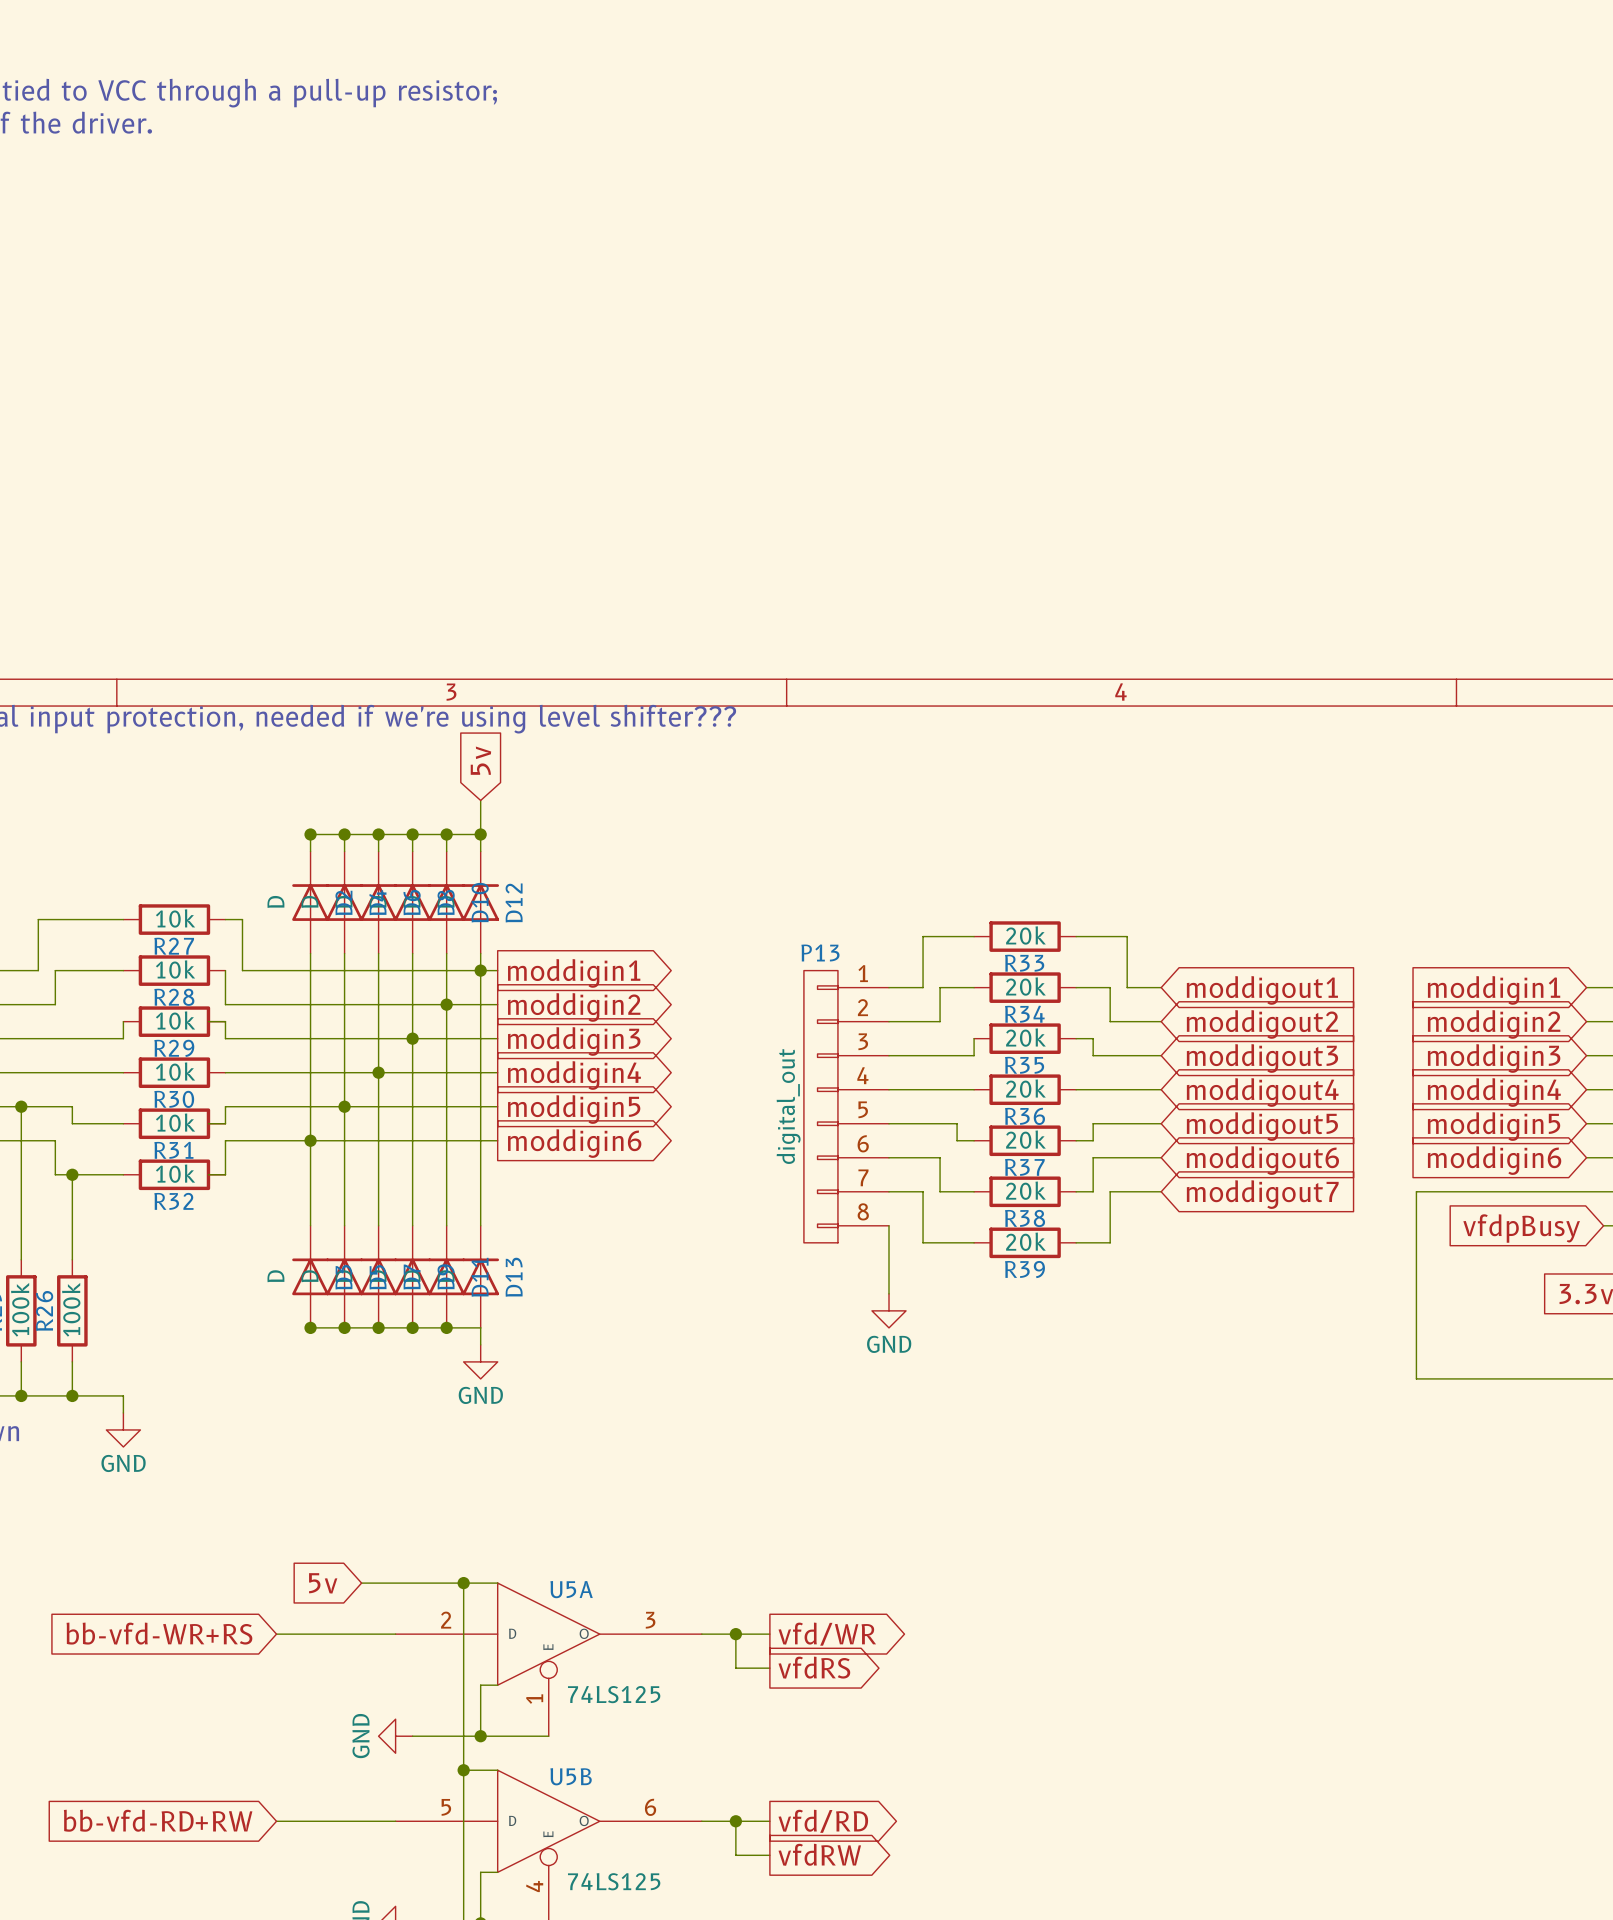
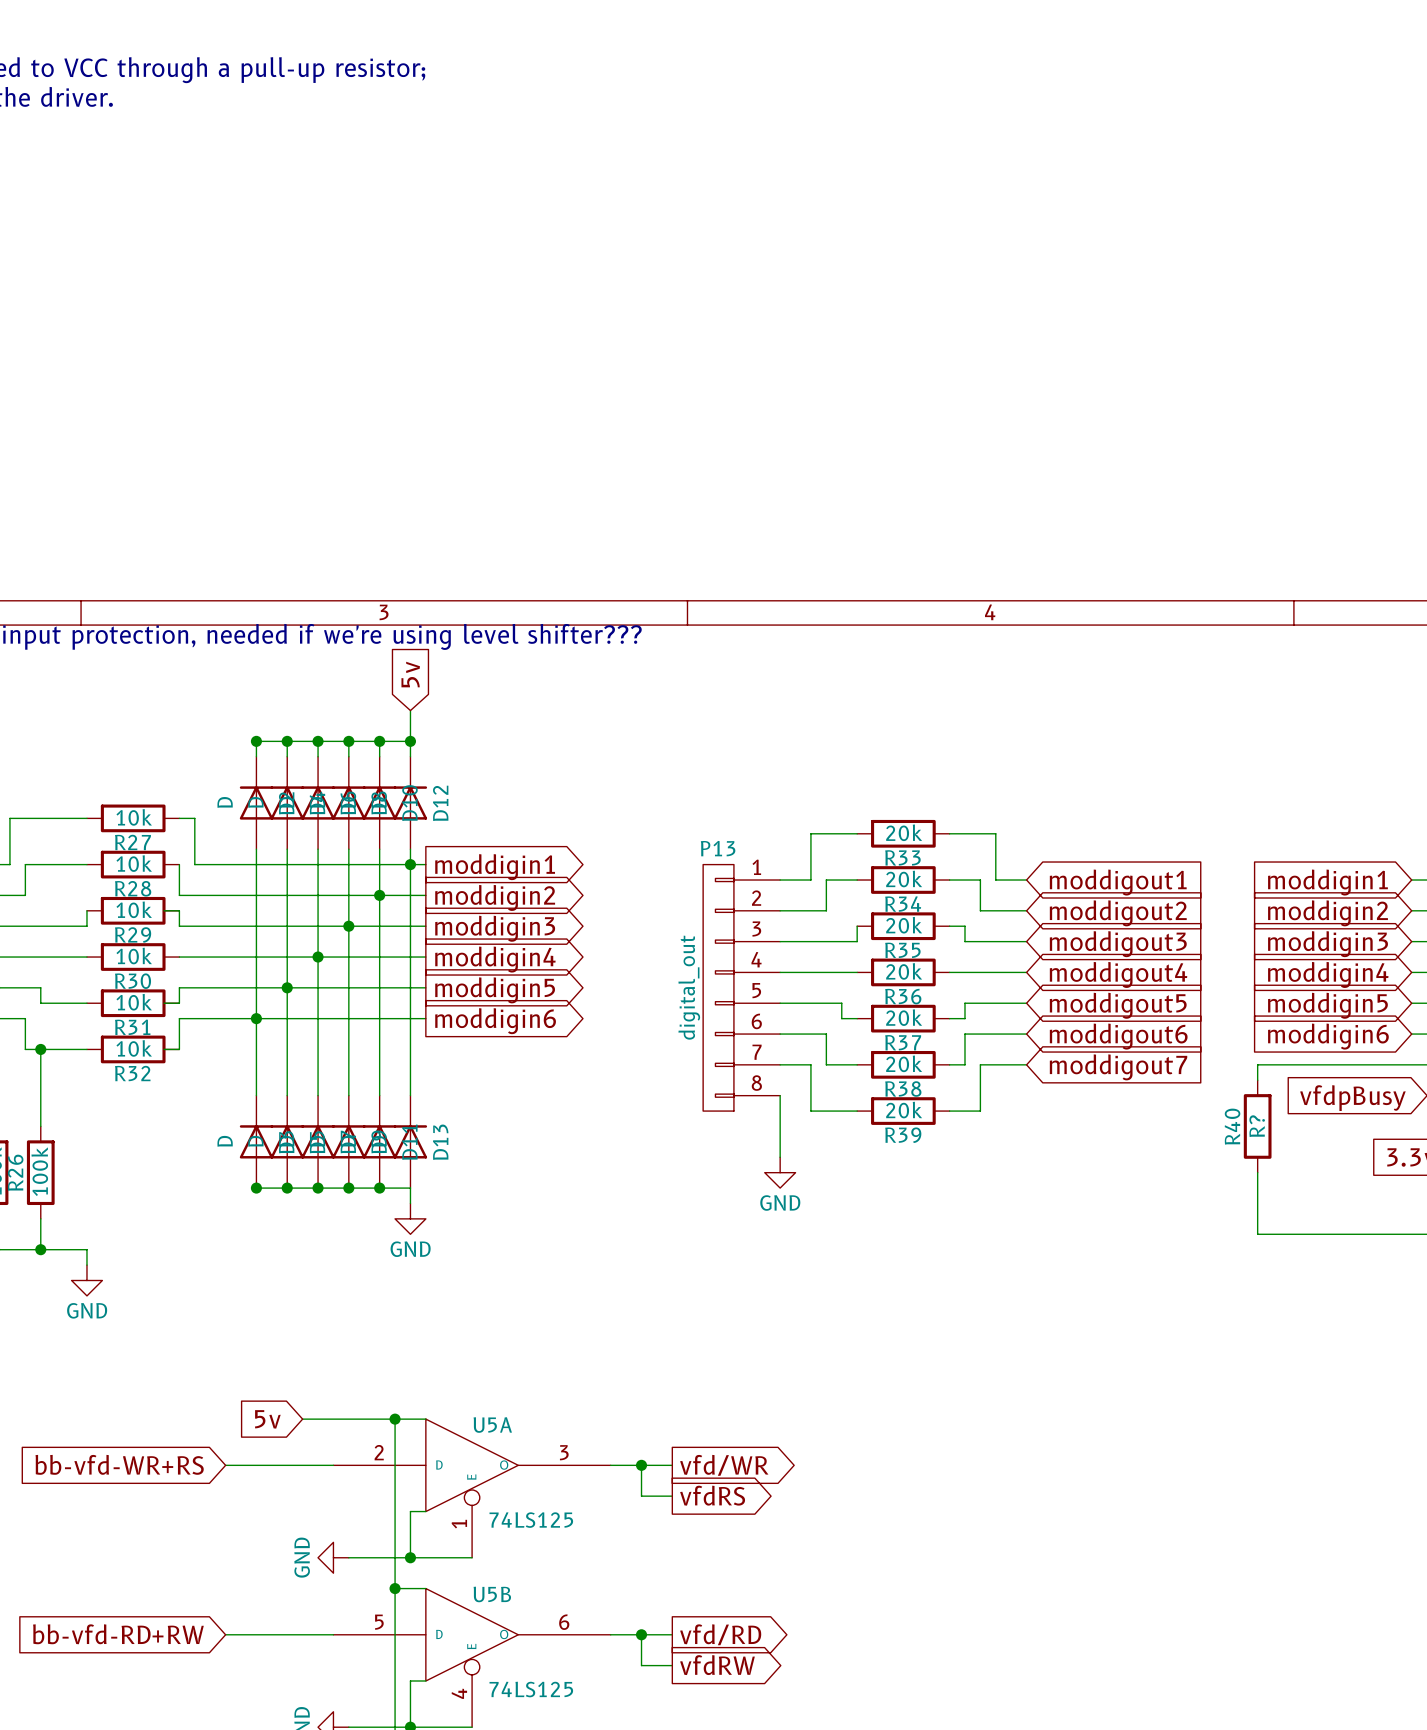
wire: (1416, 1208) (1416, 1310) -> none
R40: none -> R? (1257, 1126)

